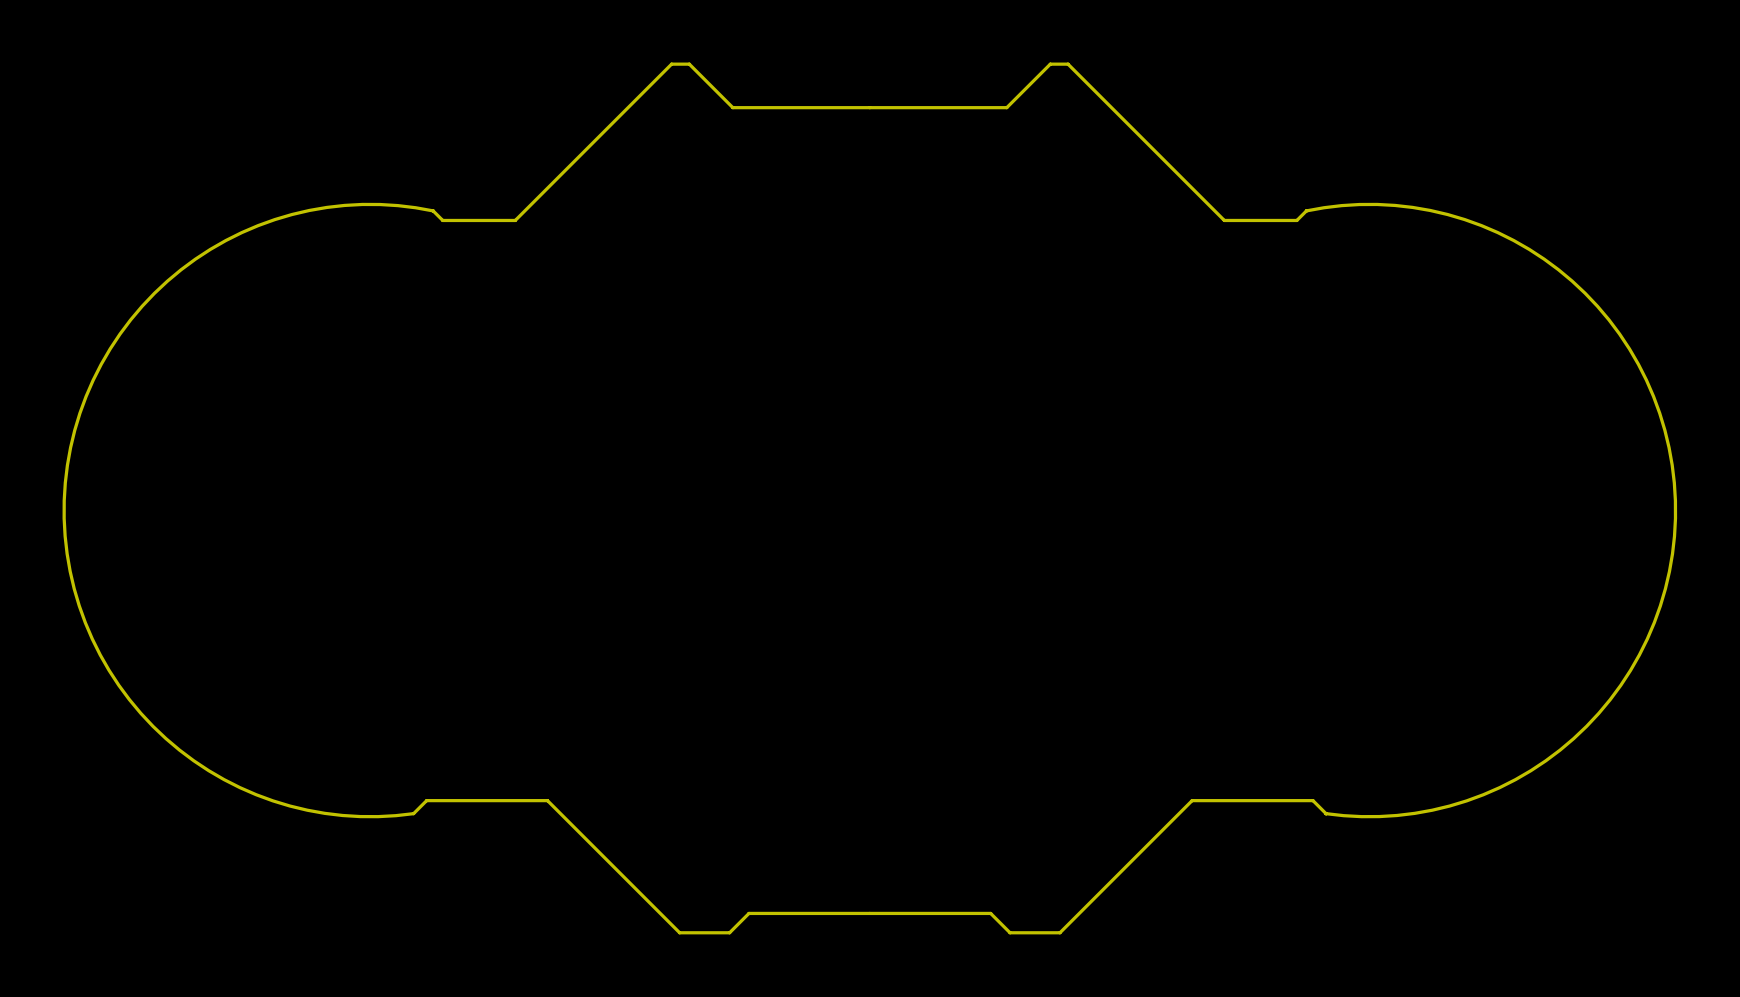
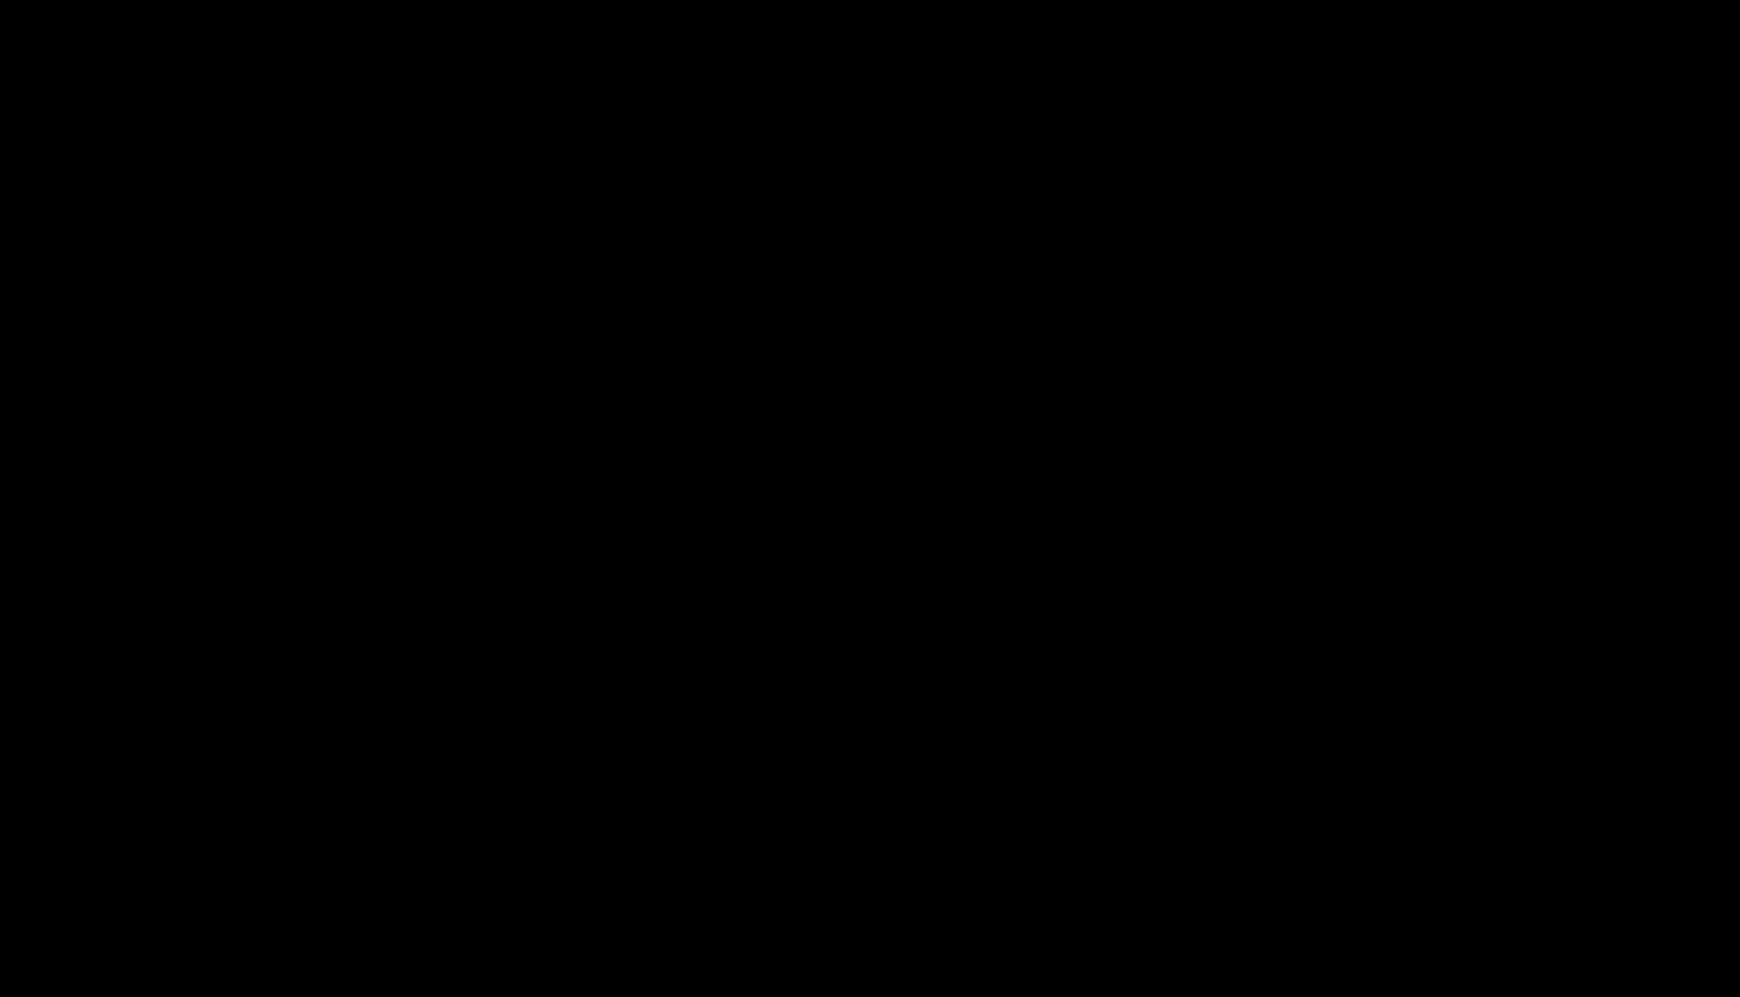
board edge: (1068, 64) (1050, 64) (1006, 107) (732, 107) (689, 64) (671, 64) (515, 220) (442, 220) (433, 210) (415, 207) (380, 204) (344, 205) (309, 210) (274, 219) (241, 232) (210, 249) (167, 281) (142, 306) (120, 334) (93, 380) (79, 413) (70, 447) (64, 500) (67, 553) (79, 605) (92, 639) (109, 670) (140, 713) (165, 738) (193, 760) (239, 787) (290, 806) (324, 813) (378, 816) (413, 813) (426, 800) (547, 800) (679, 932) (729, 932) (748, 913) (990, 913) (1010, 932) (1059, 932) (1192, 800) (1312, 800) (1326, 813) (1361, 816) (1397, 815) (1449, 806) (1483, 794) (1515, 779) (1545, 760) (1573, 738) (1598, 713) (1630, 670) (1654, 622) (1665, 588) (1672, 553) (1675, 500) (1672, 465) (1664, 430) (1646, 380) (1619, 334) (1585, 293) (1544, 259) (1497, 232) (1447, 214) (1395, 205) (1359, 204) (1306, 210) (1296, 220) (1224, 220) (1068, 64) -> none

